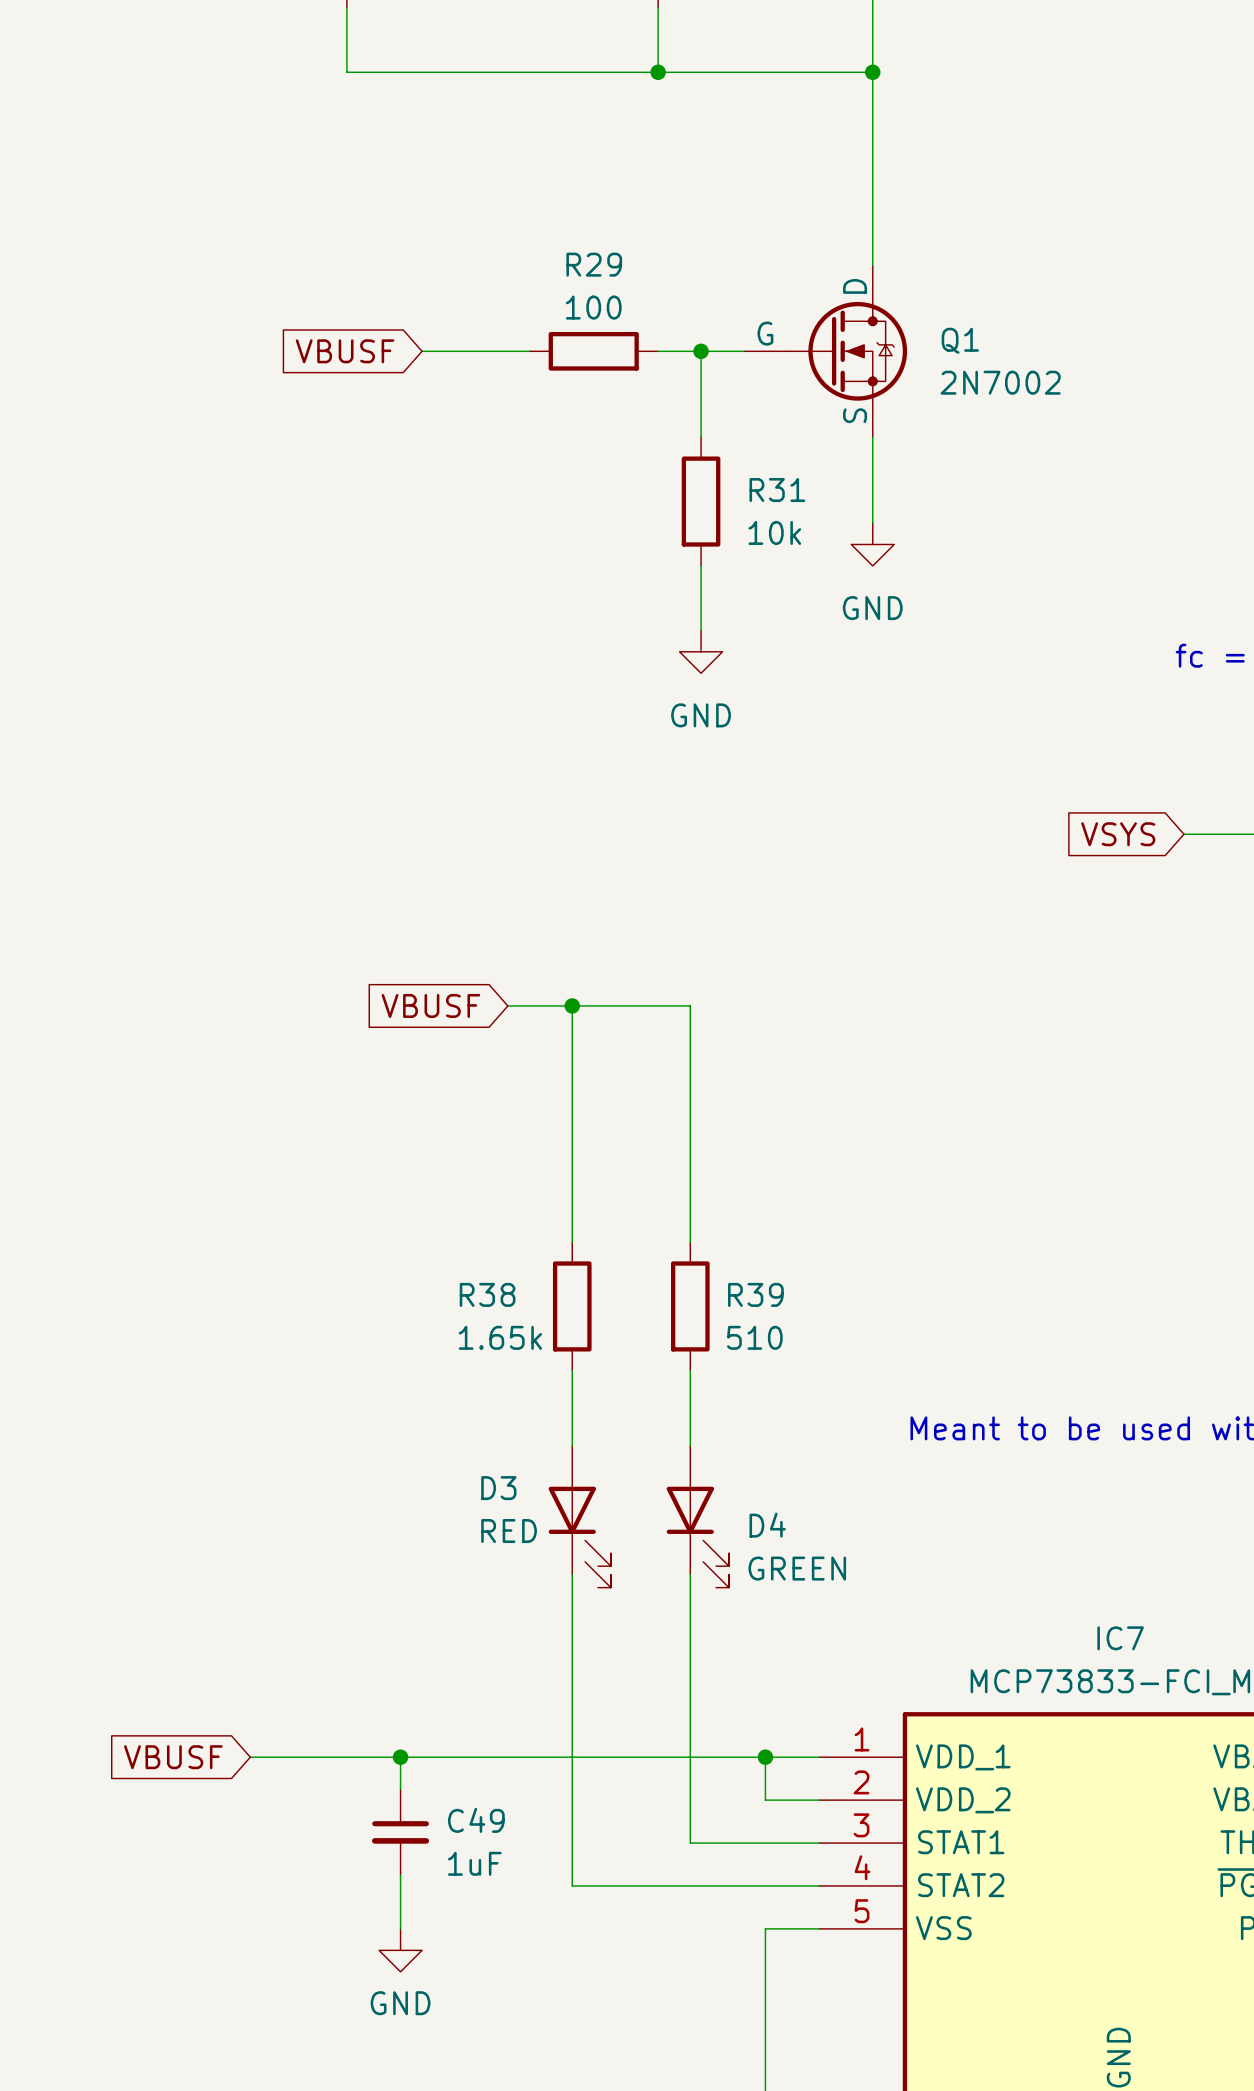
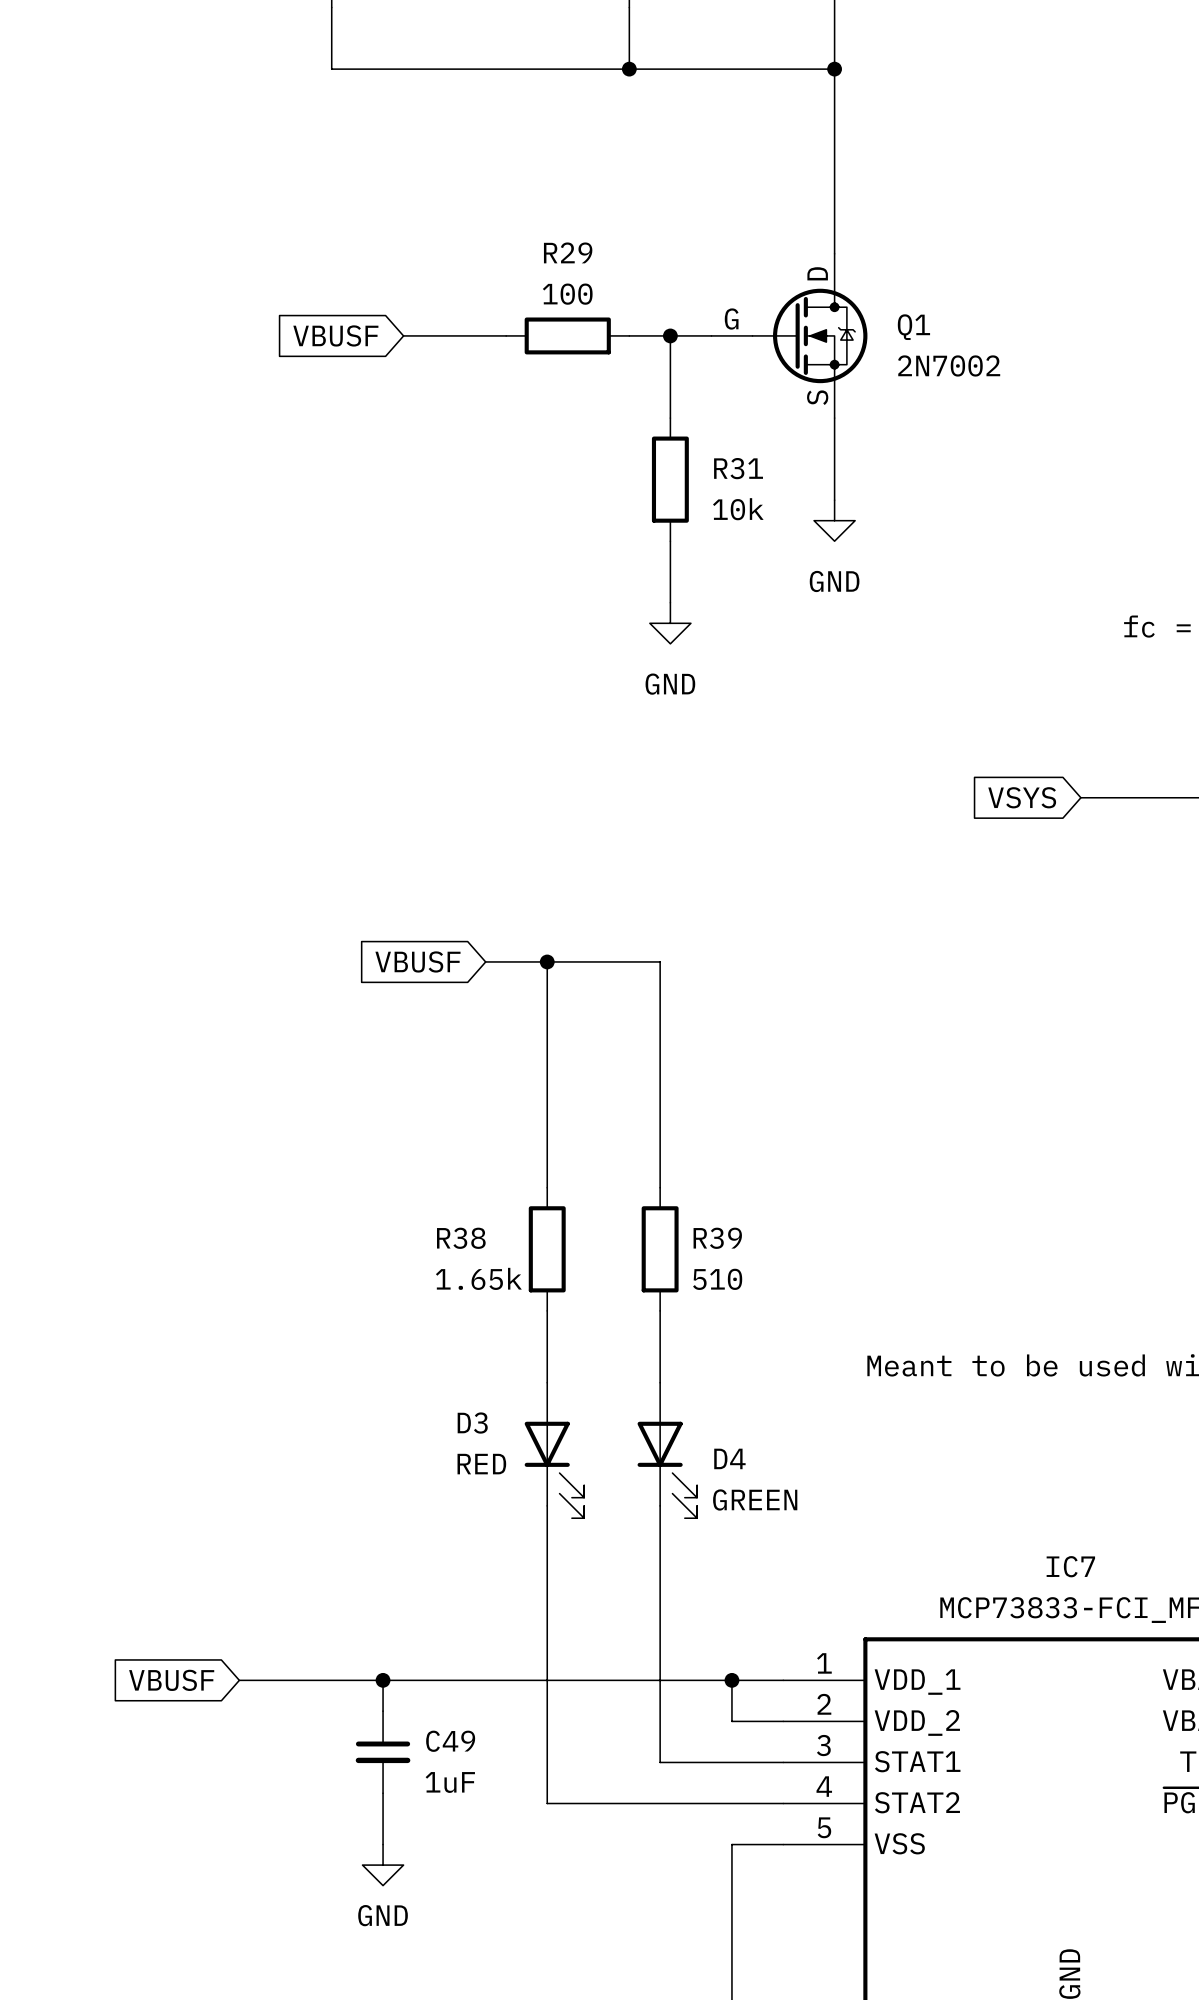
global label position: VSYS (1118, 834) -> VSYS (1022, 797)
wire: none -> (1080, 797) (1132, 797)

